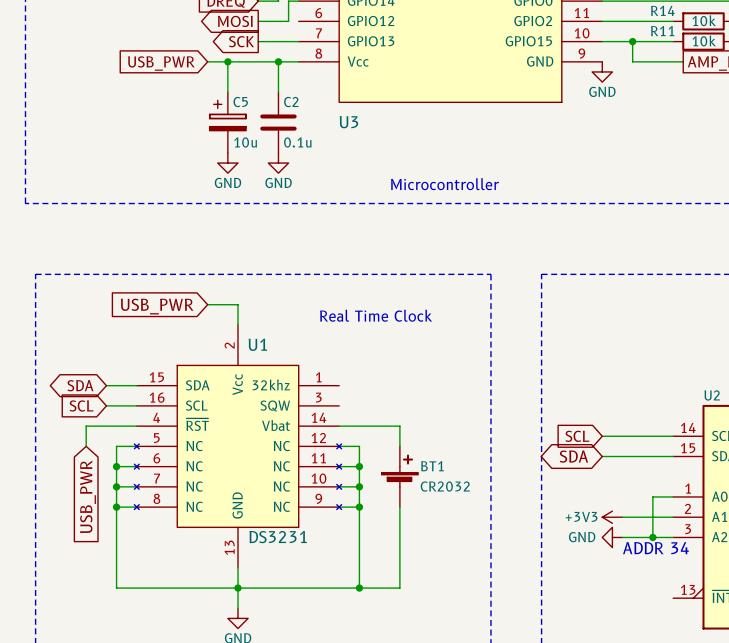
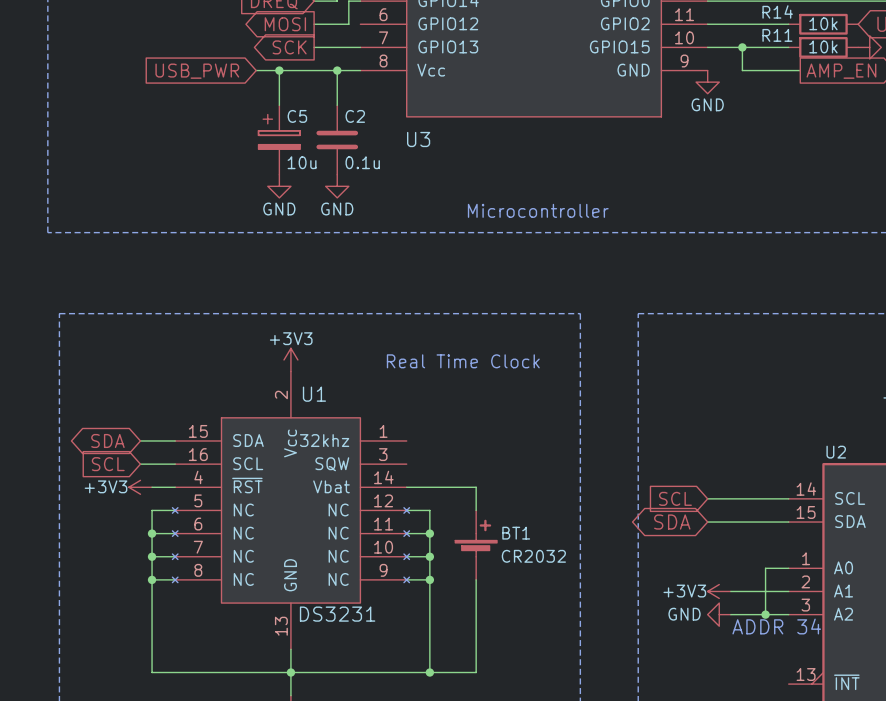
wire: (207, 304) (237, 304) (237, 324) -> none
global label: USB_PWR (157, 306) -> none
power symbol: none -> +3V3 (290, 359)
power symbol: none -> +3V3 (140, 487)
wire: (116, 426) (86, 426) (86, 446) -> none
global label: USB_PWR (88, 496) -> none

